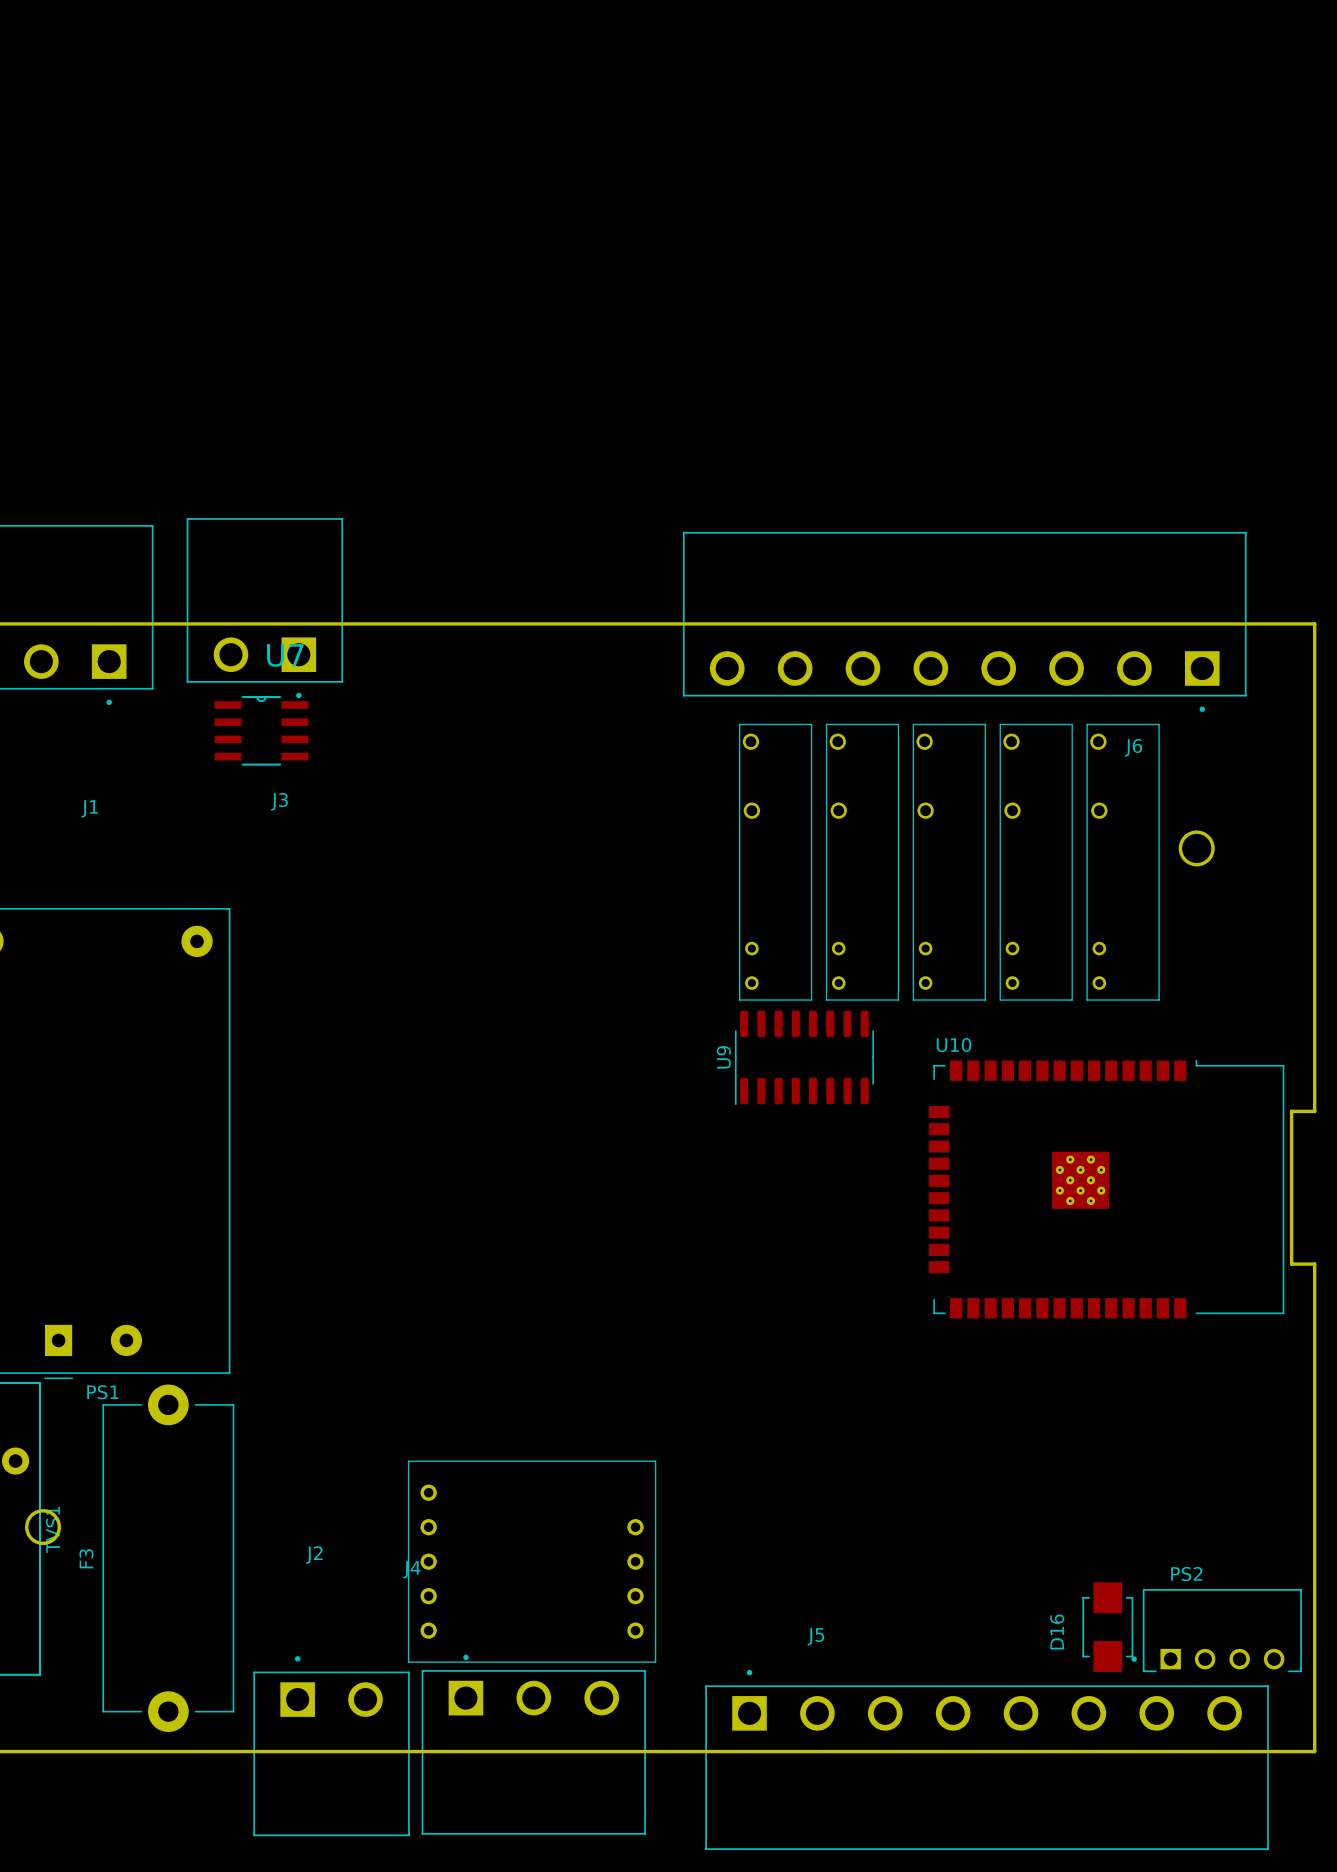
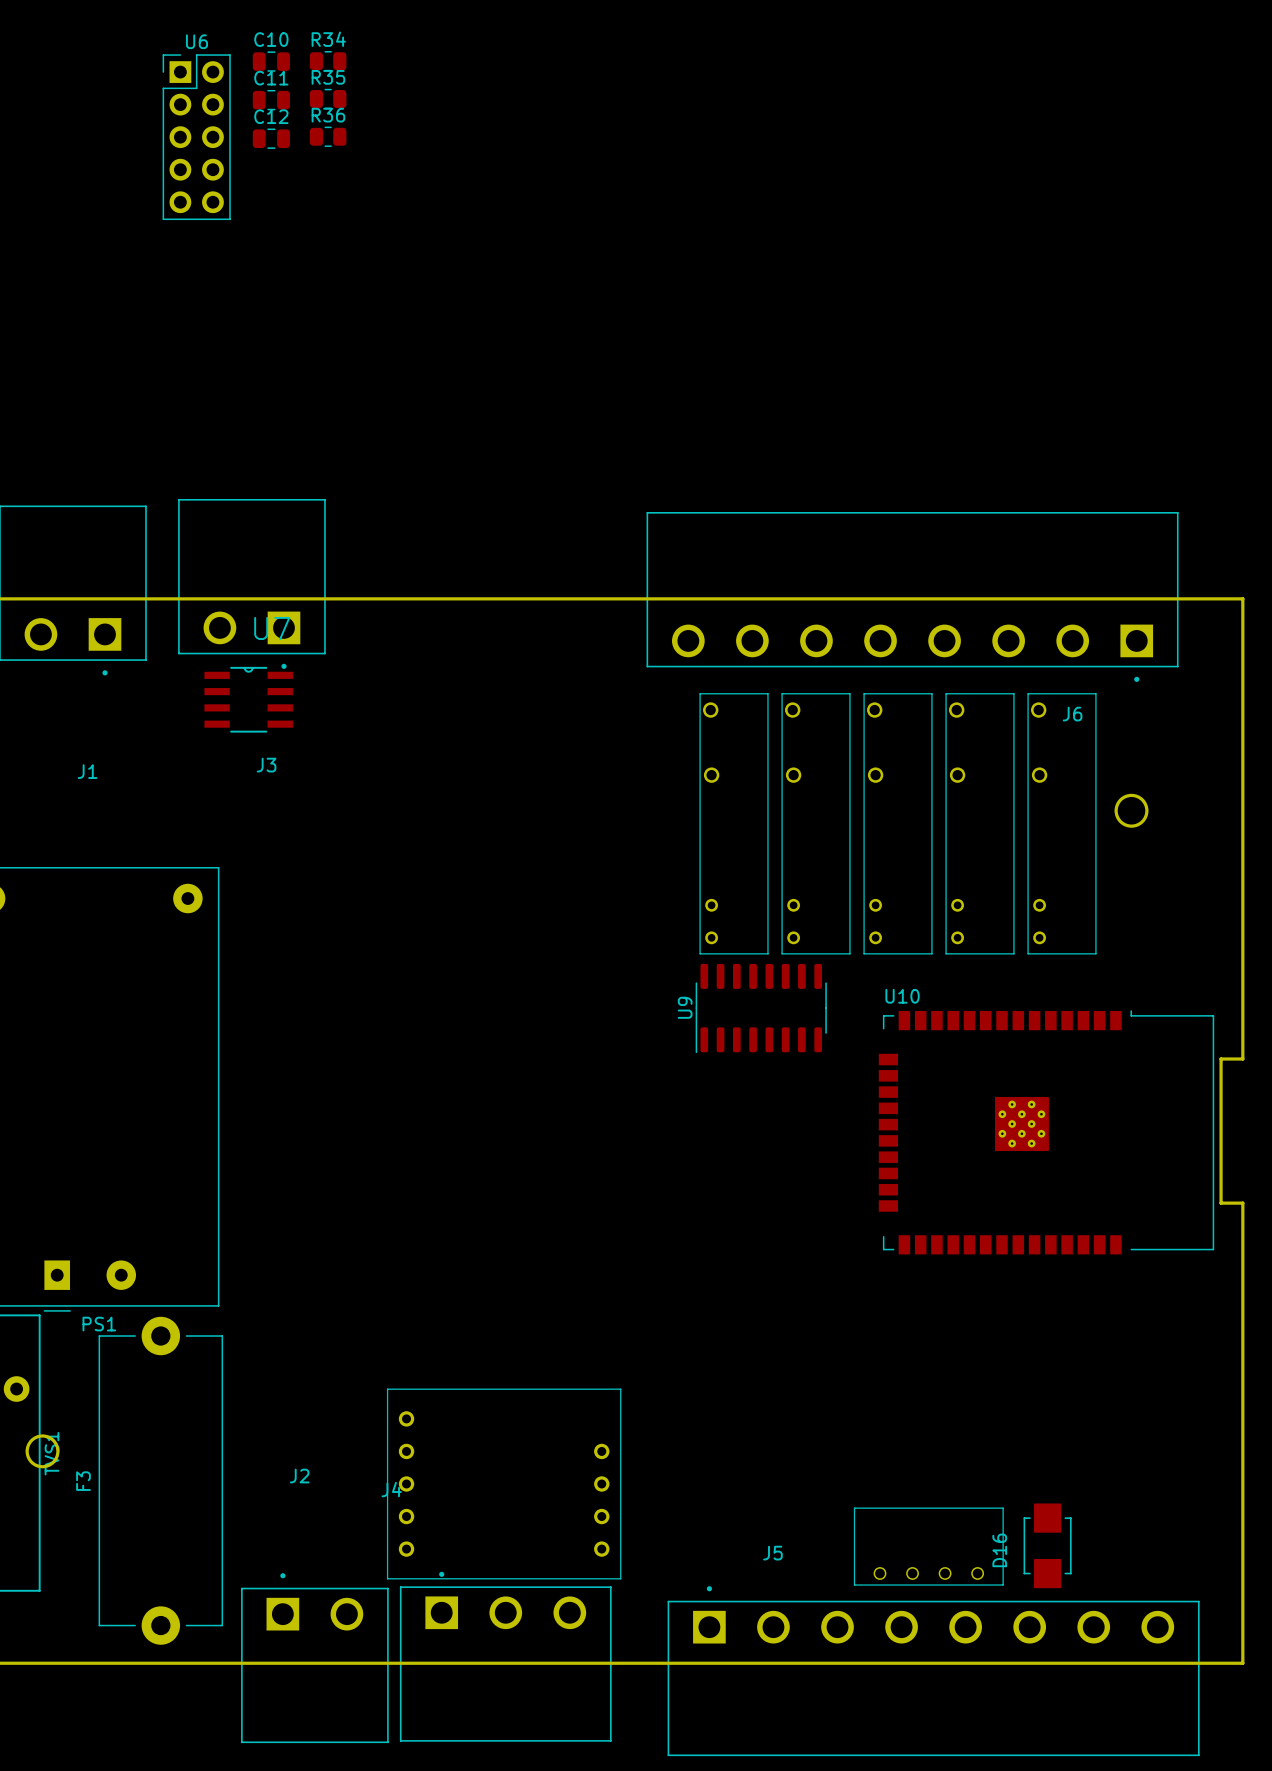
C10: none -> (271, 61)
R34: none -> (328, 61)
R35: none -> (328, 98)
C11: none -> (271, 100)
U6: none -> (196, 137)
R36: none -> (328, 136)
C12: none -> (271, 138)
part: none -> (928, 1546)
PS2: (1216, 1630) -> none

